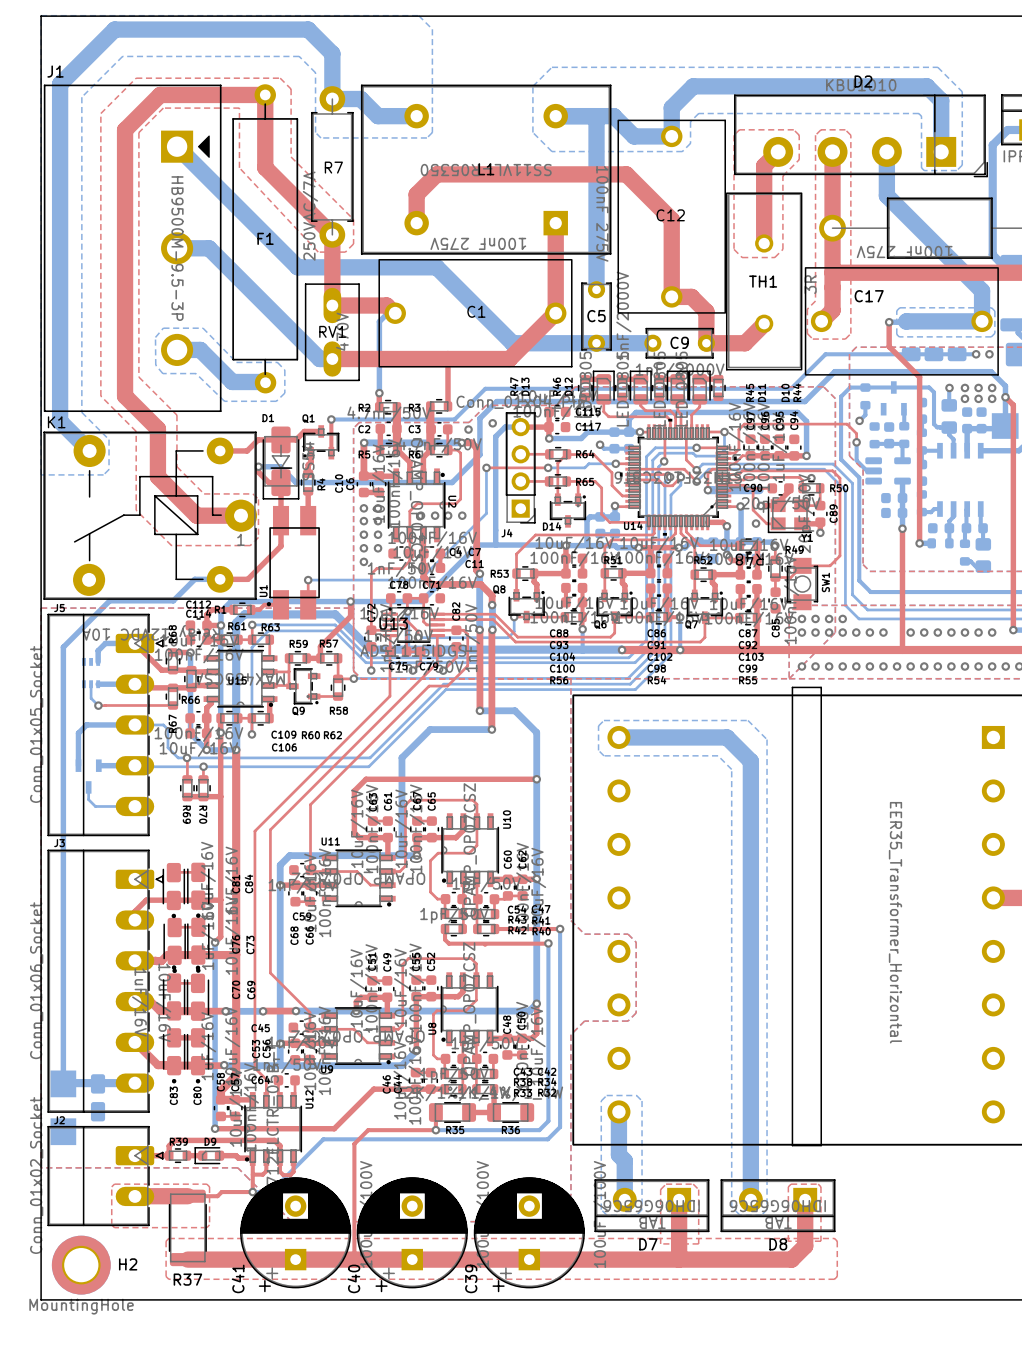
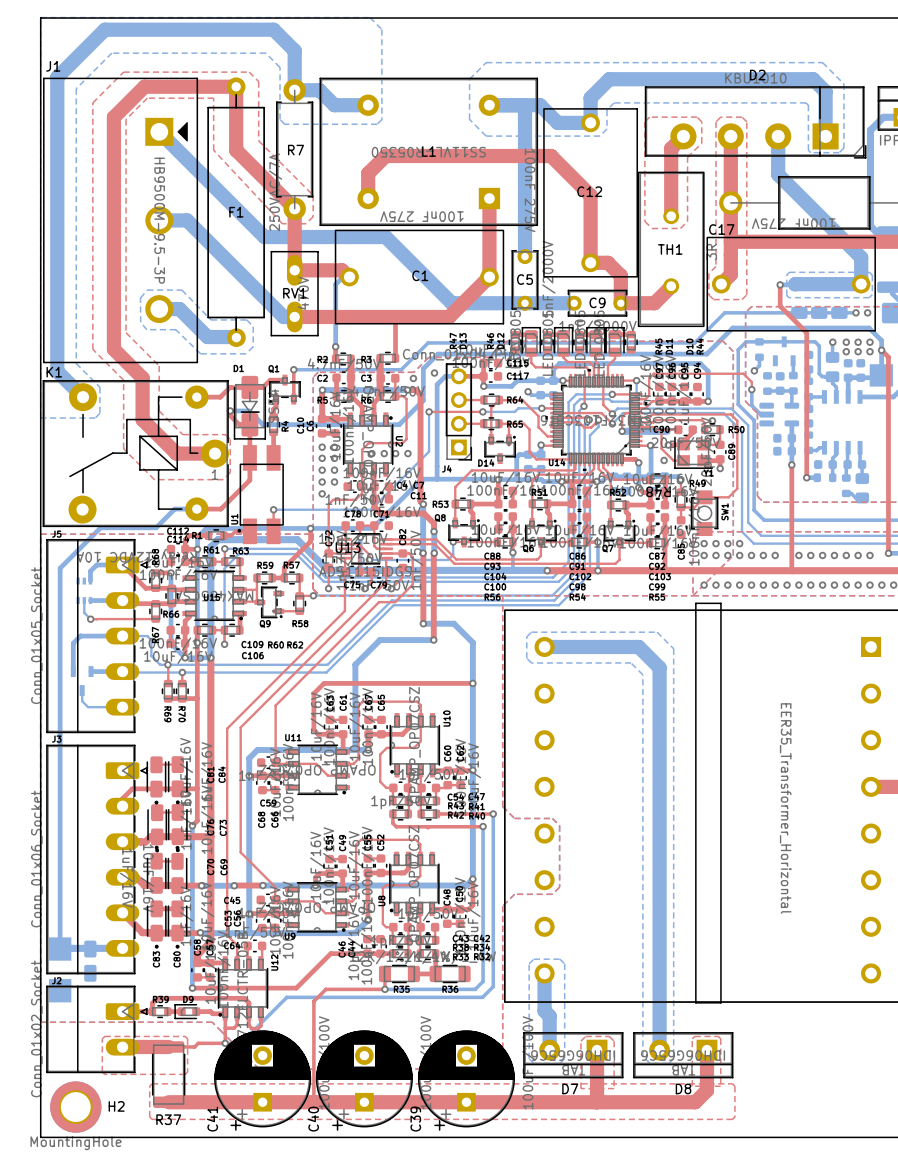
C17 name position: C17 (869, 296) -> C17 (721, 229)

